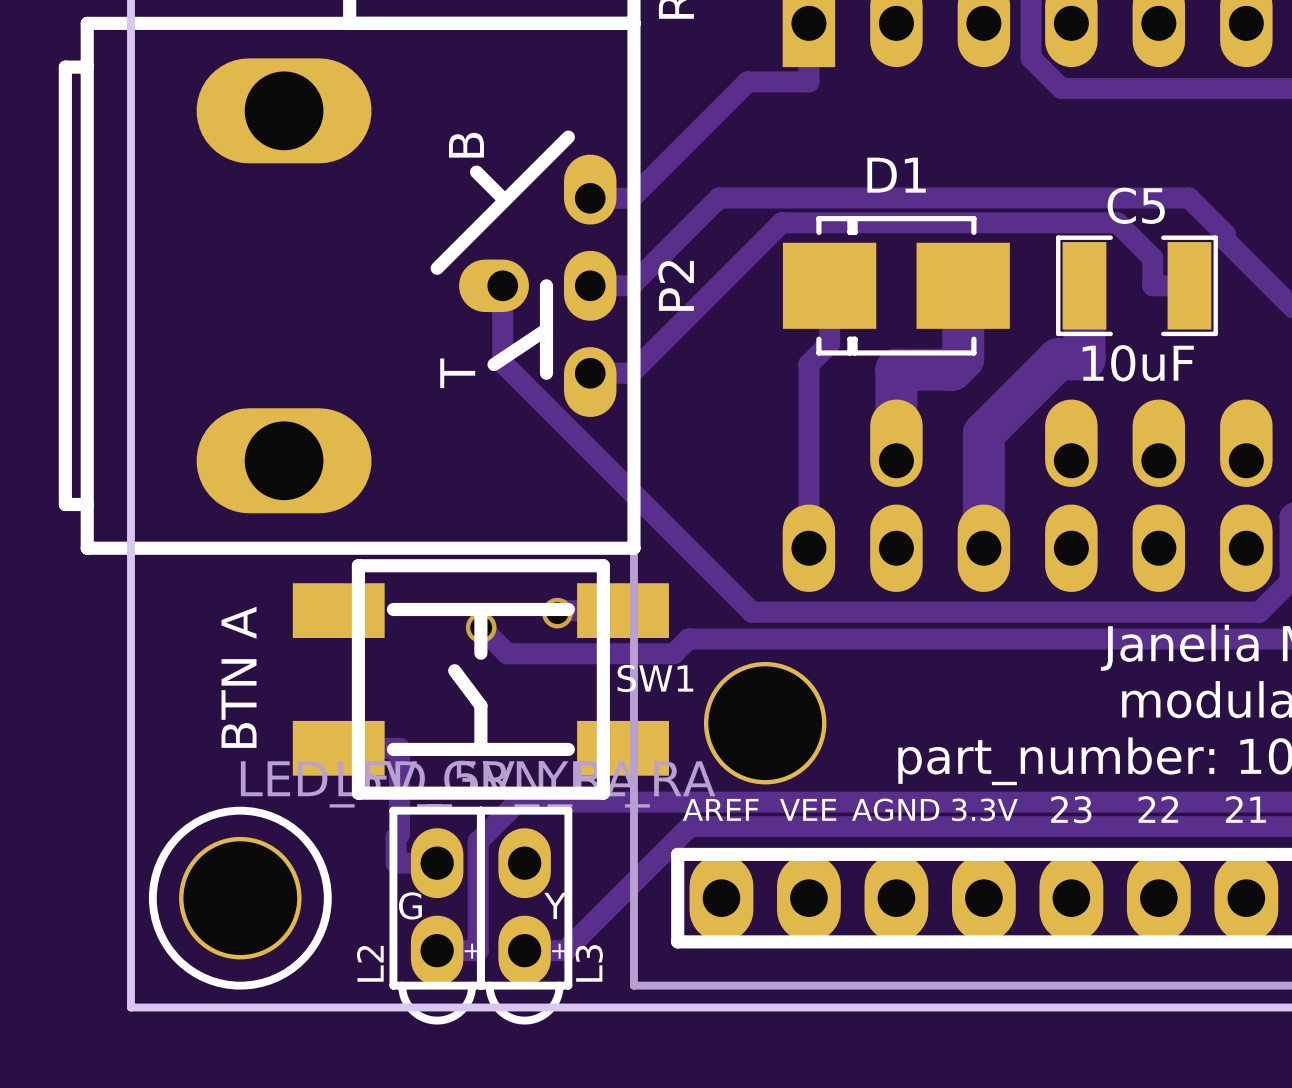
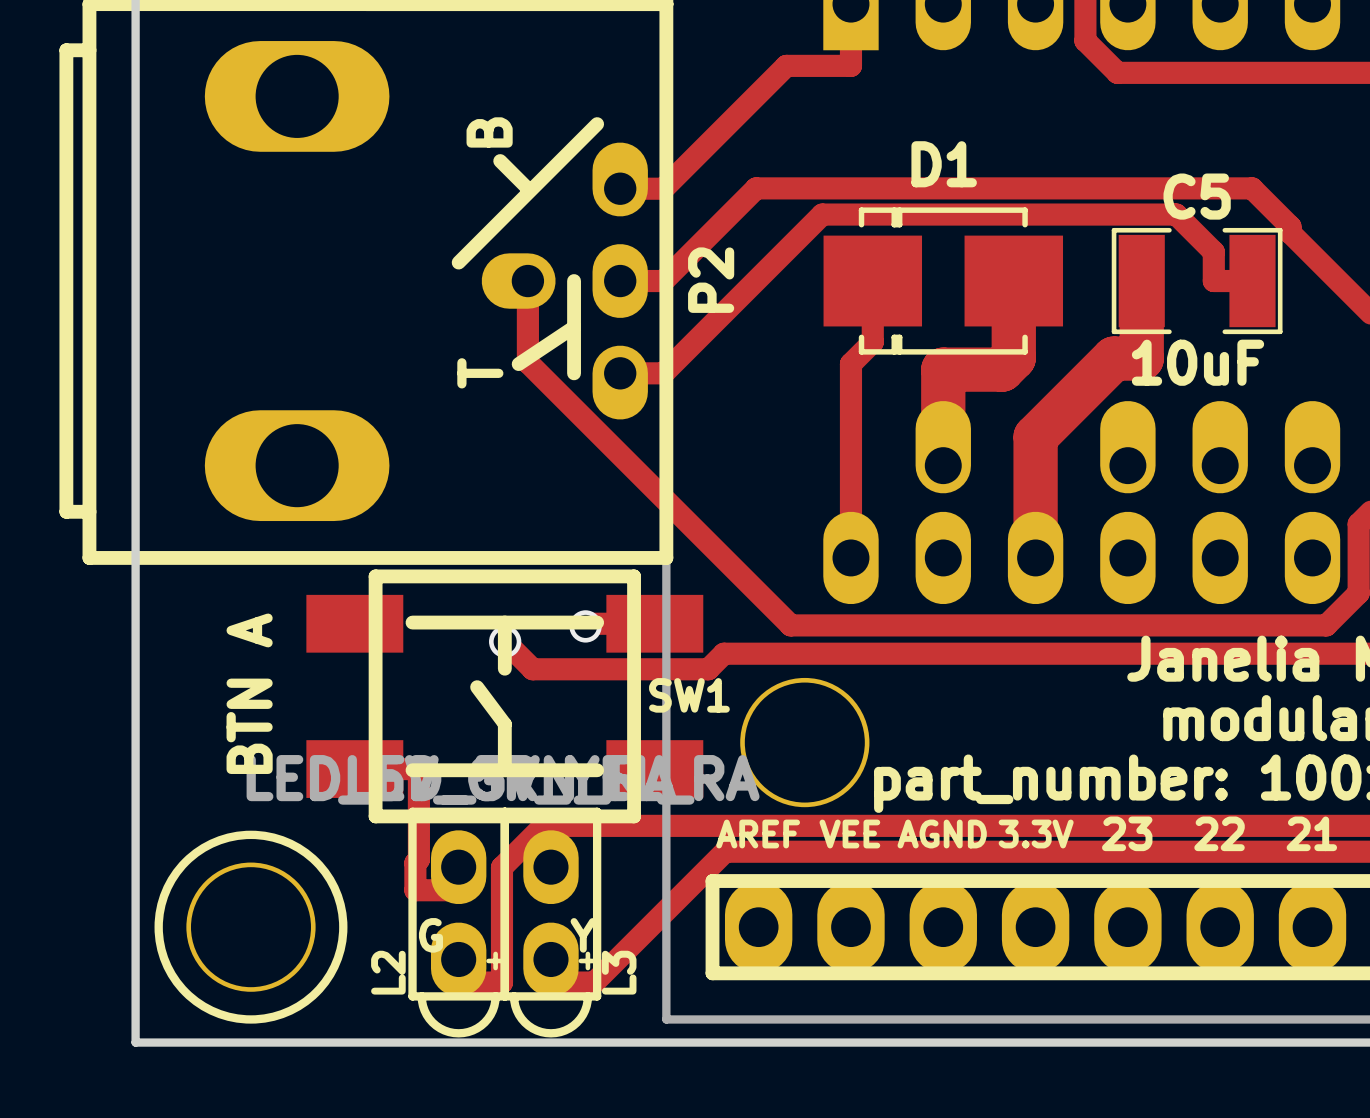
L2 position: (437, 915) -> (458, 922)
L3 position: (524, 915) -> (550, 922)

